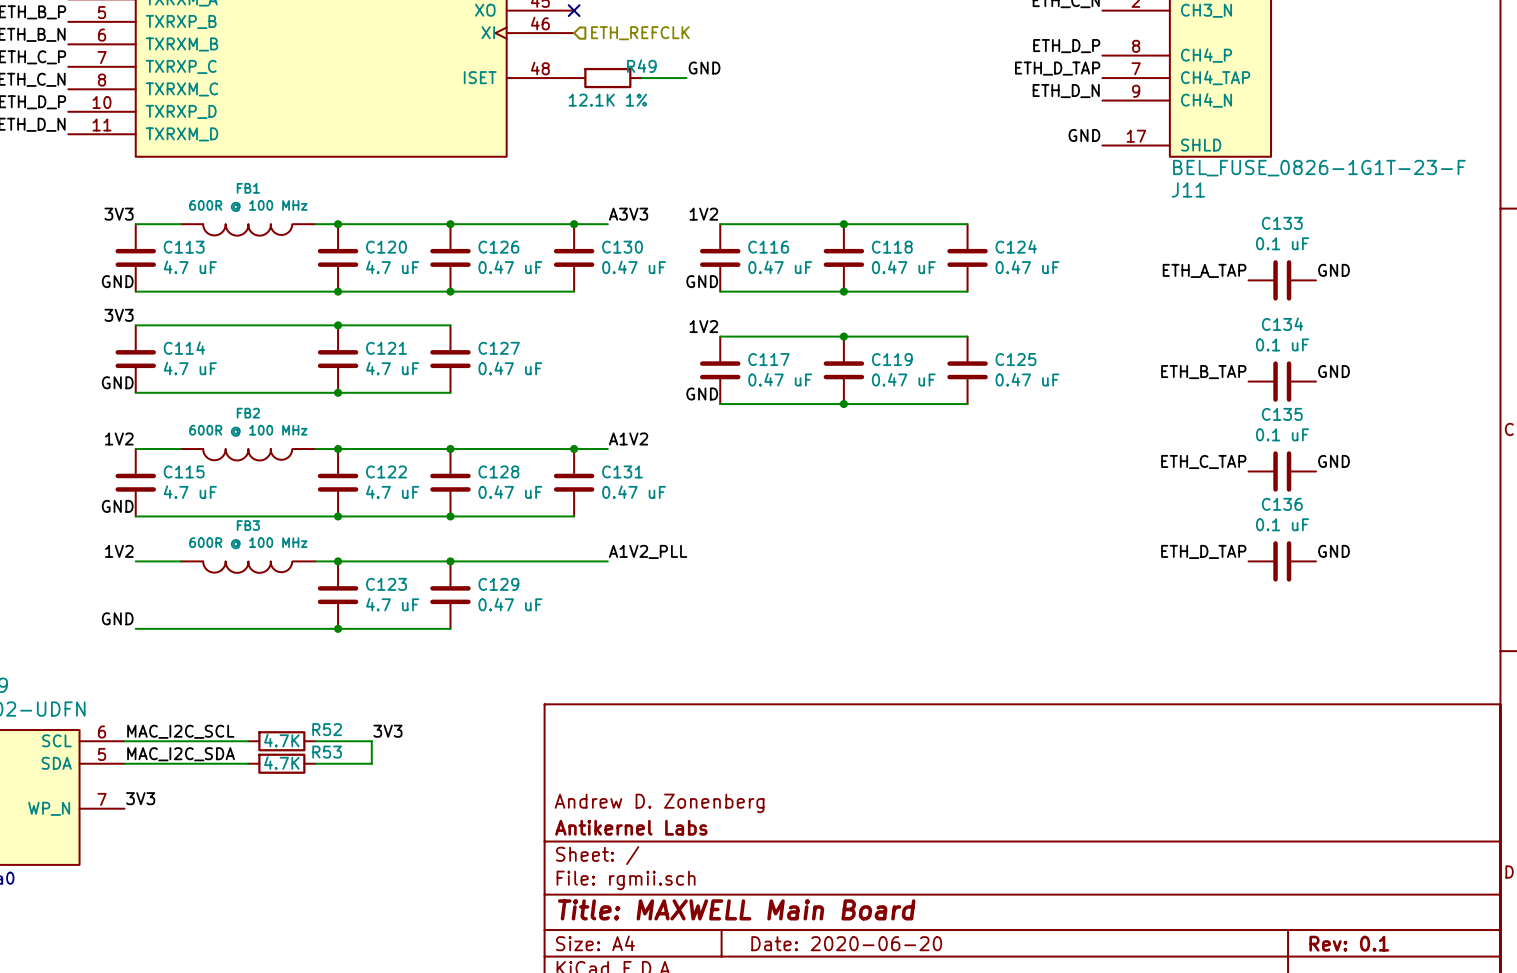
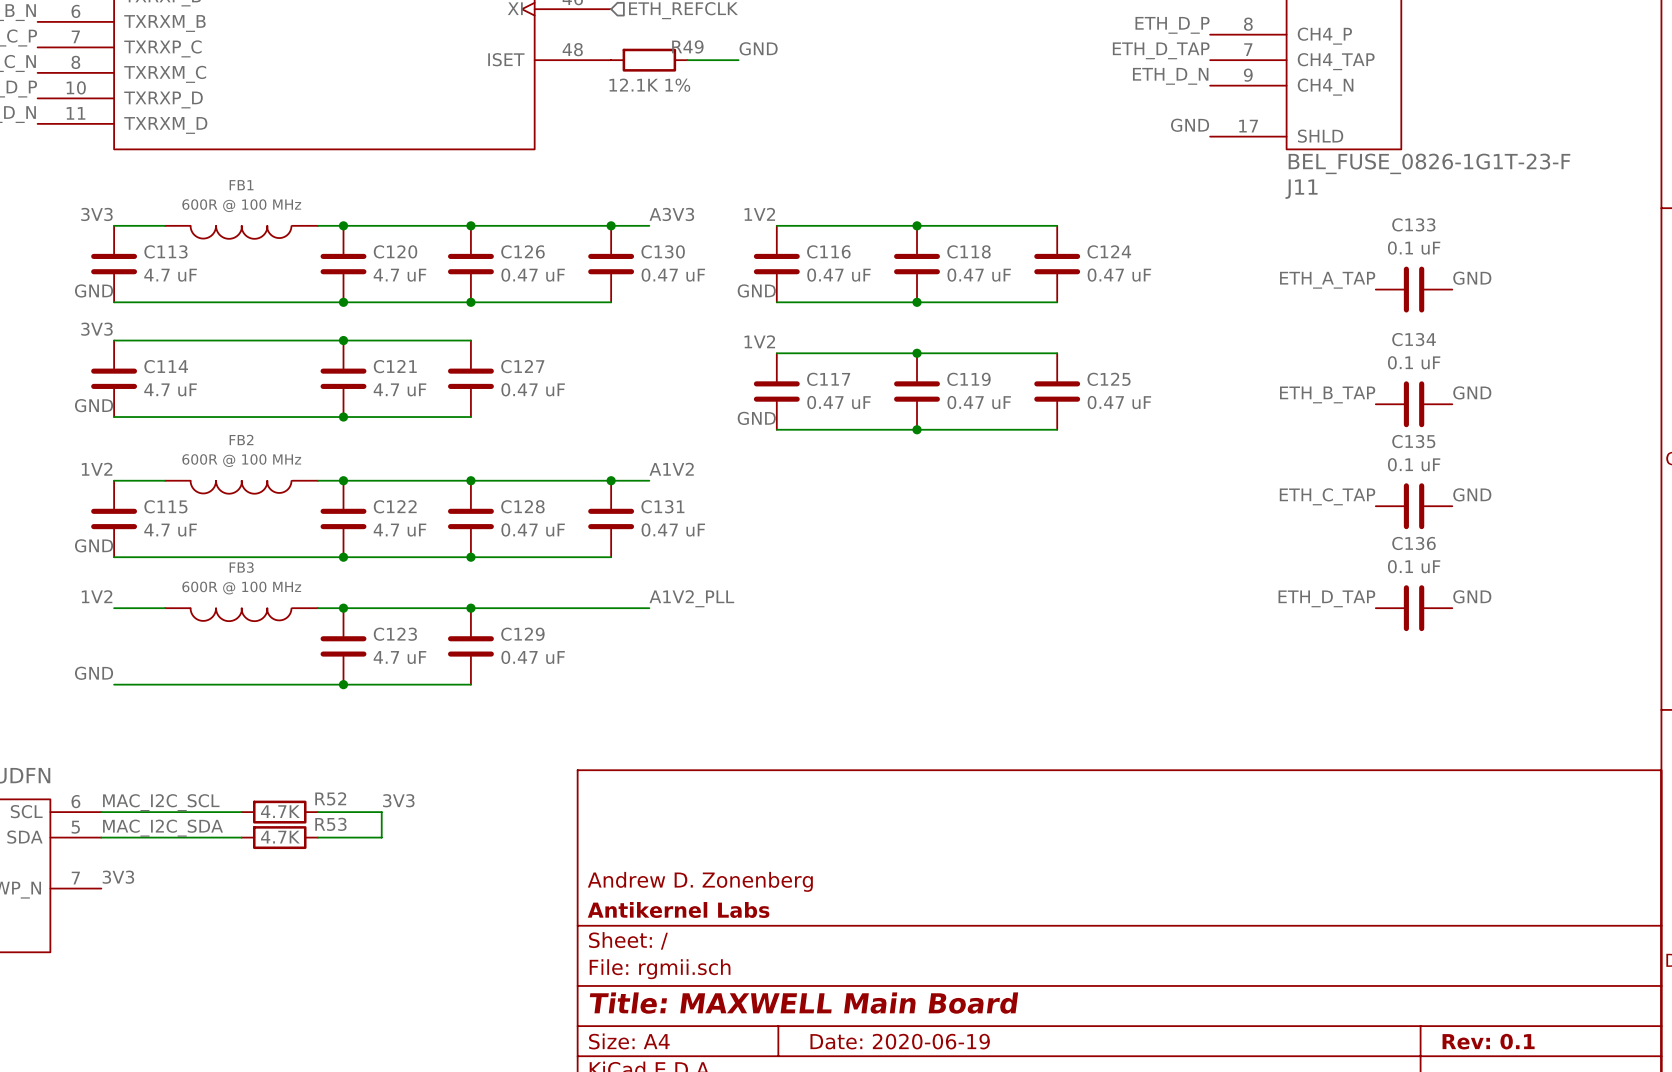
title block: Date: 2020-06-20 (846, 943) -> Date: 2020-06-19 (900, 1041)

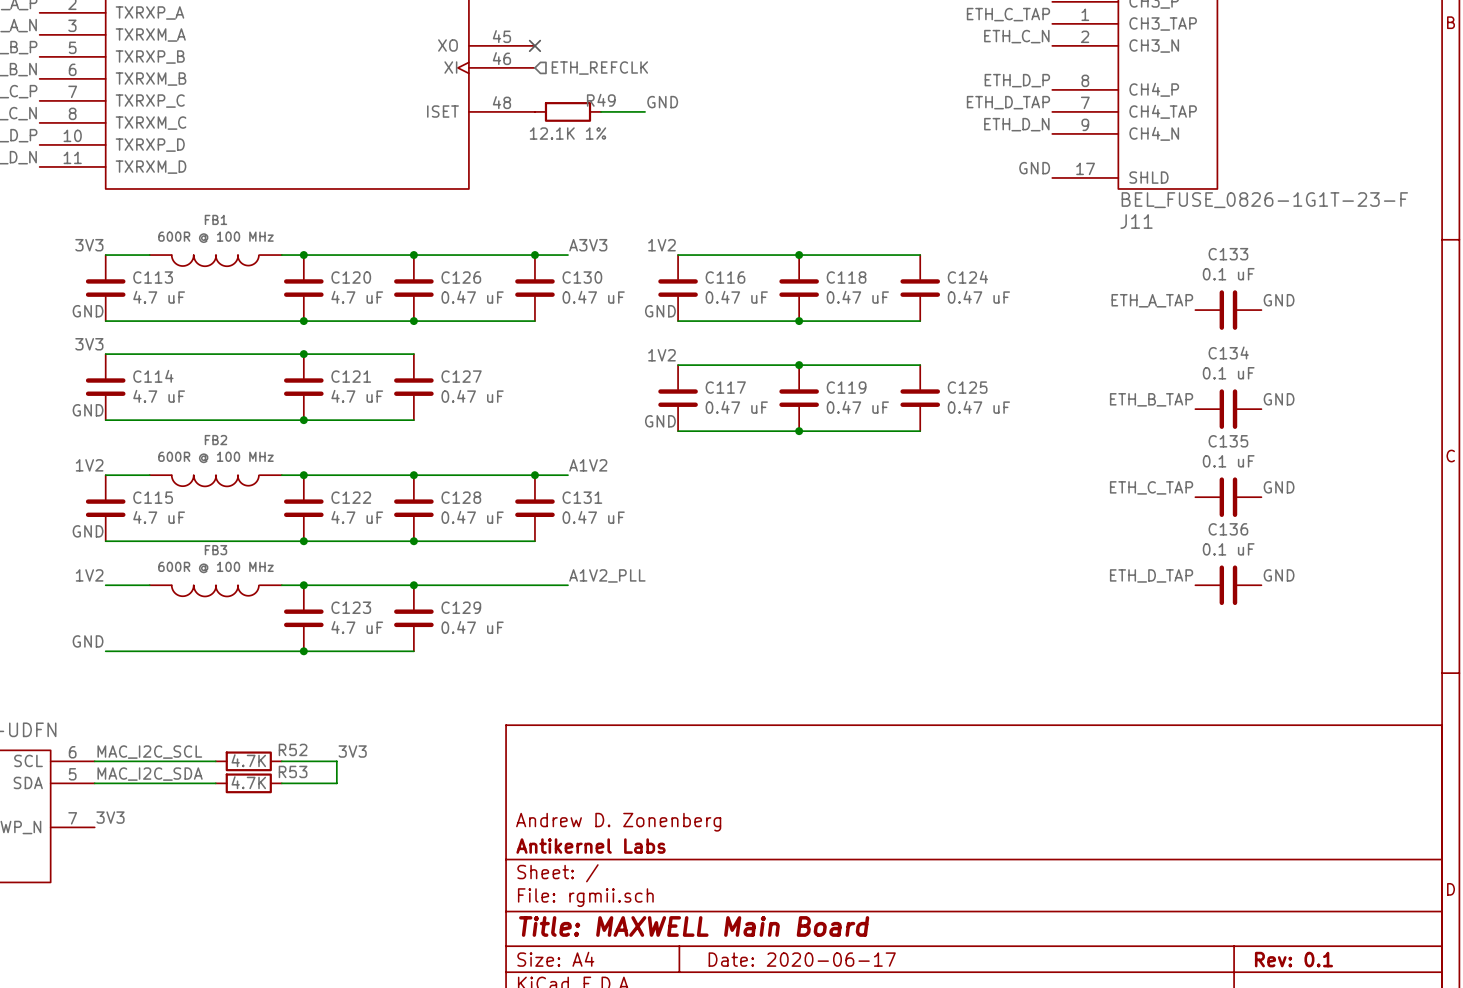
title block: Date: 2020-06-19 (900, 1041) -> Date: 2020-06-17 (802, 959)

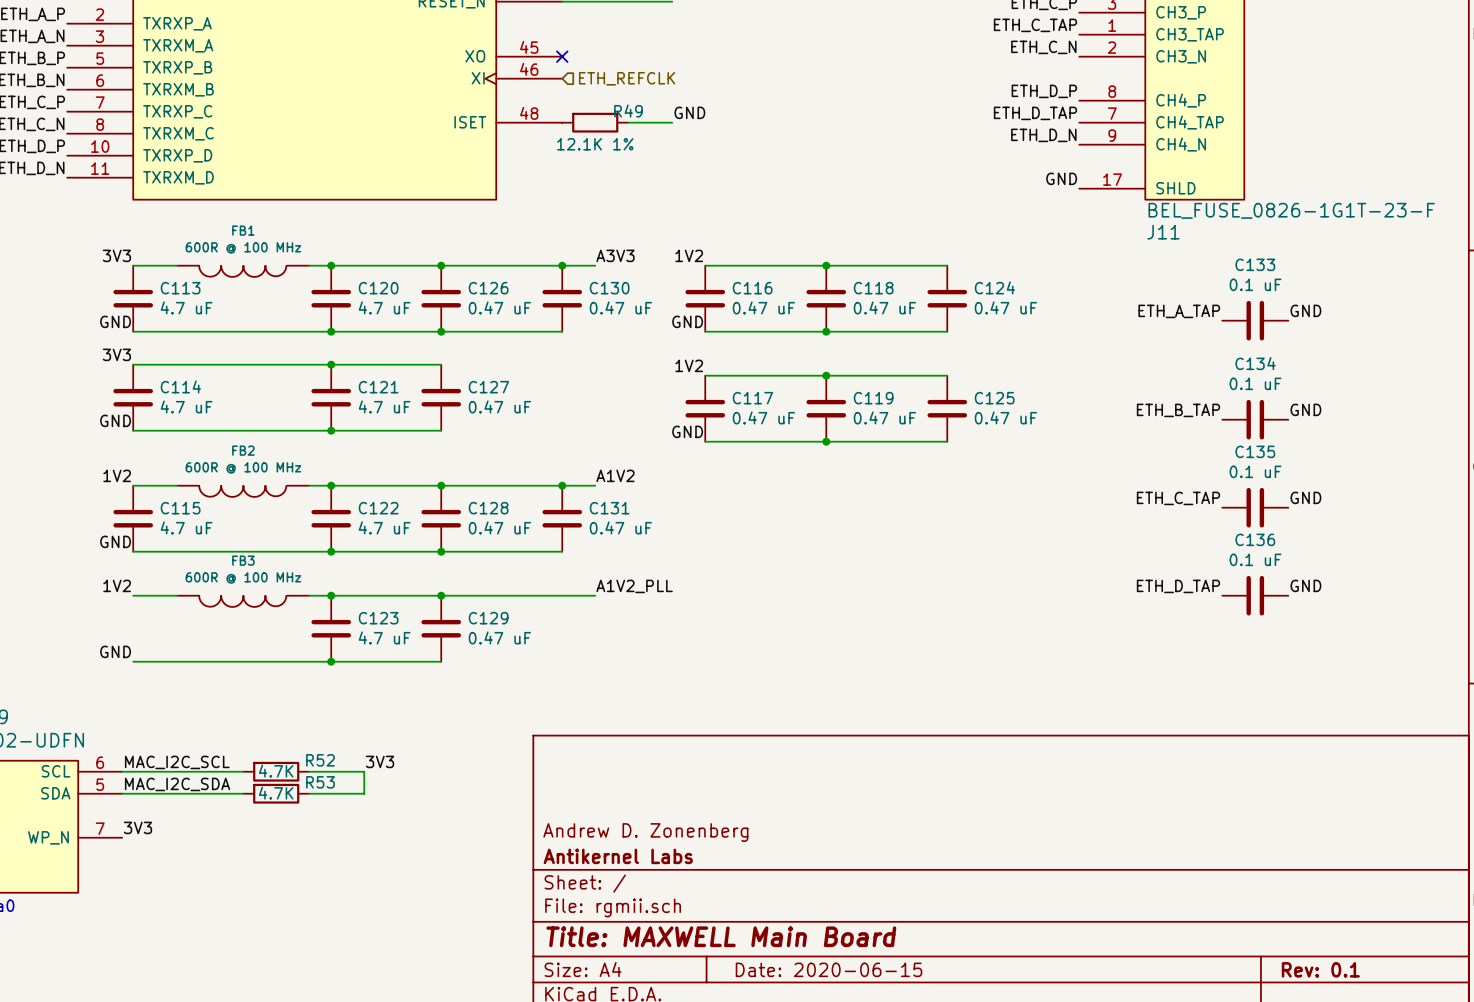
title block: Date: 2020-06-17 (802, 959) -> Date: 2020-06-15 (829, 969)

